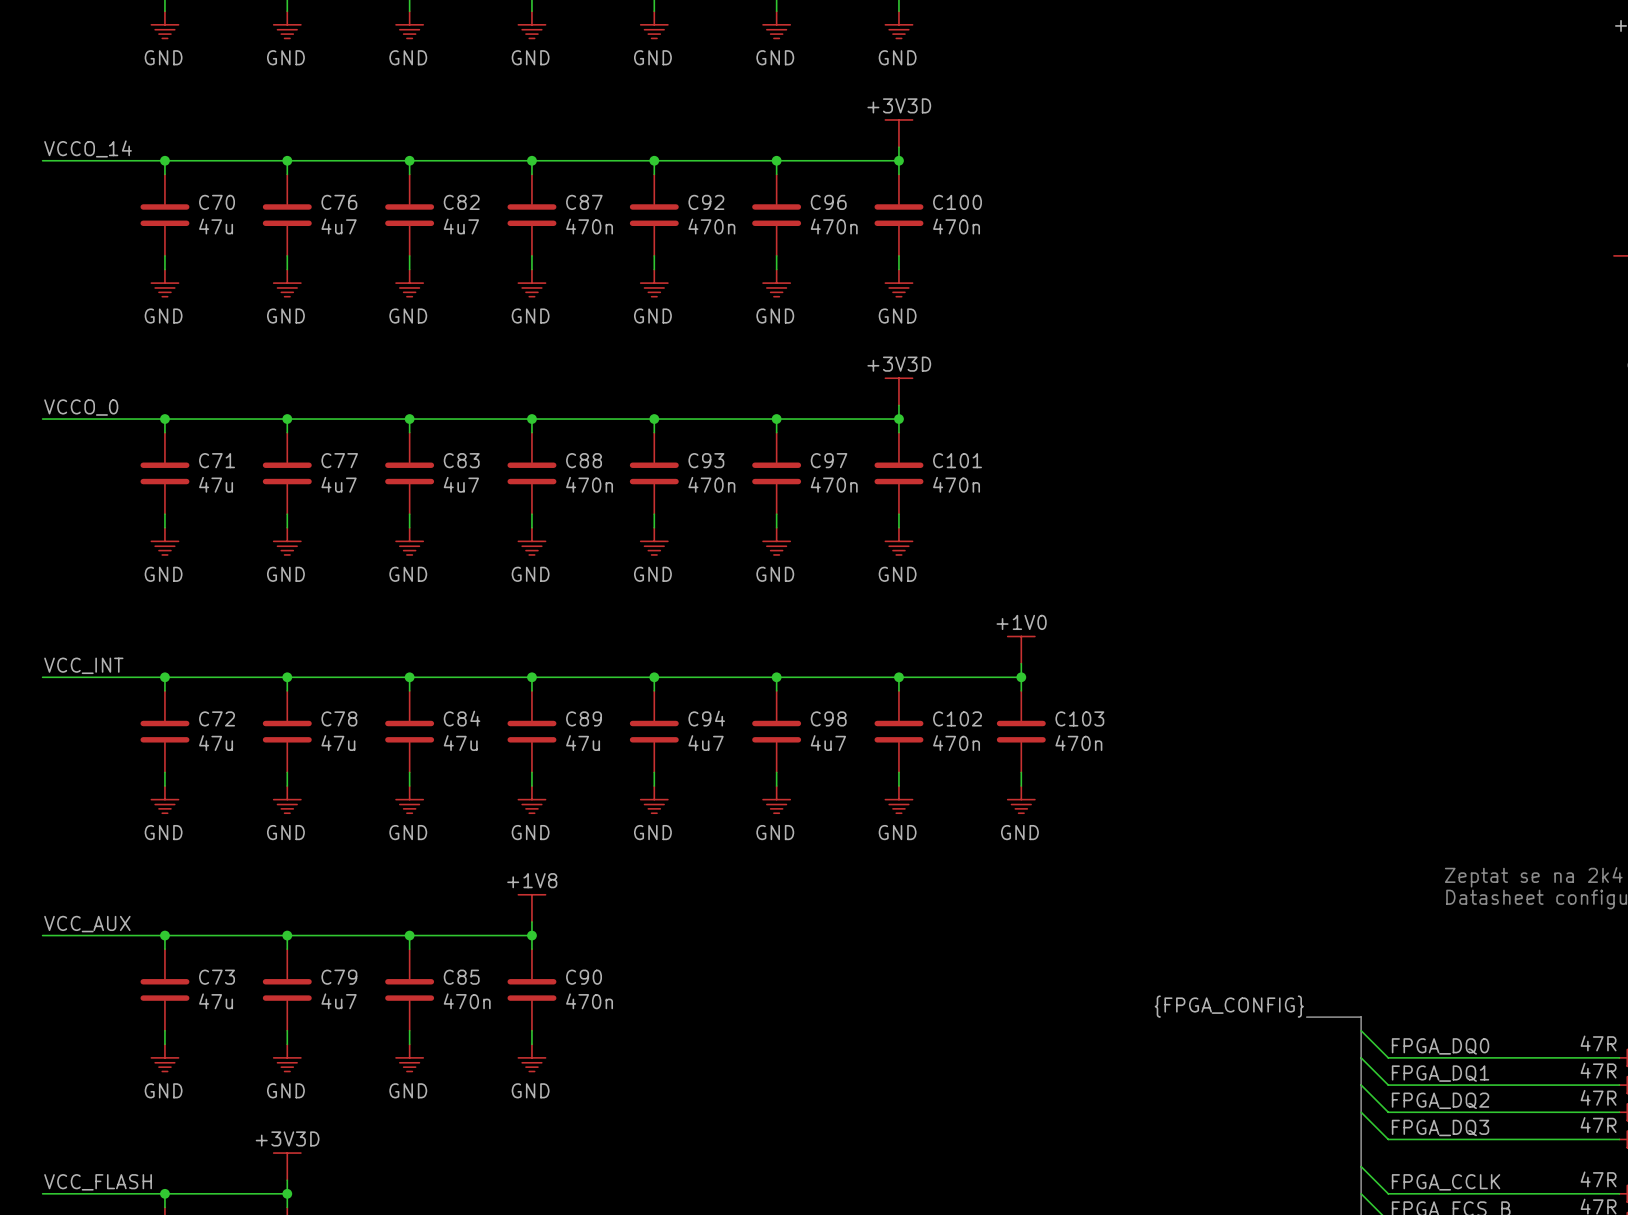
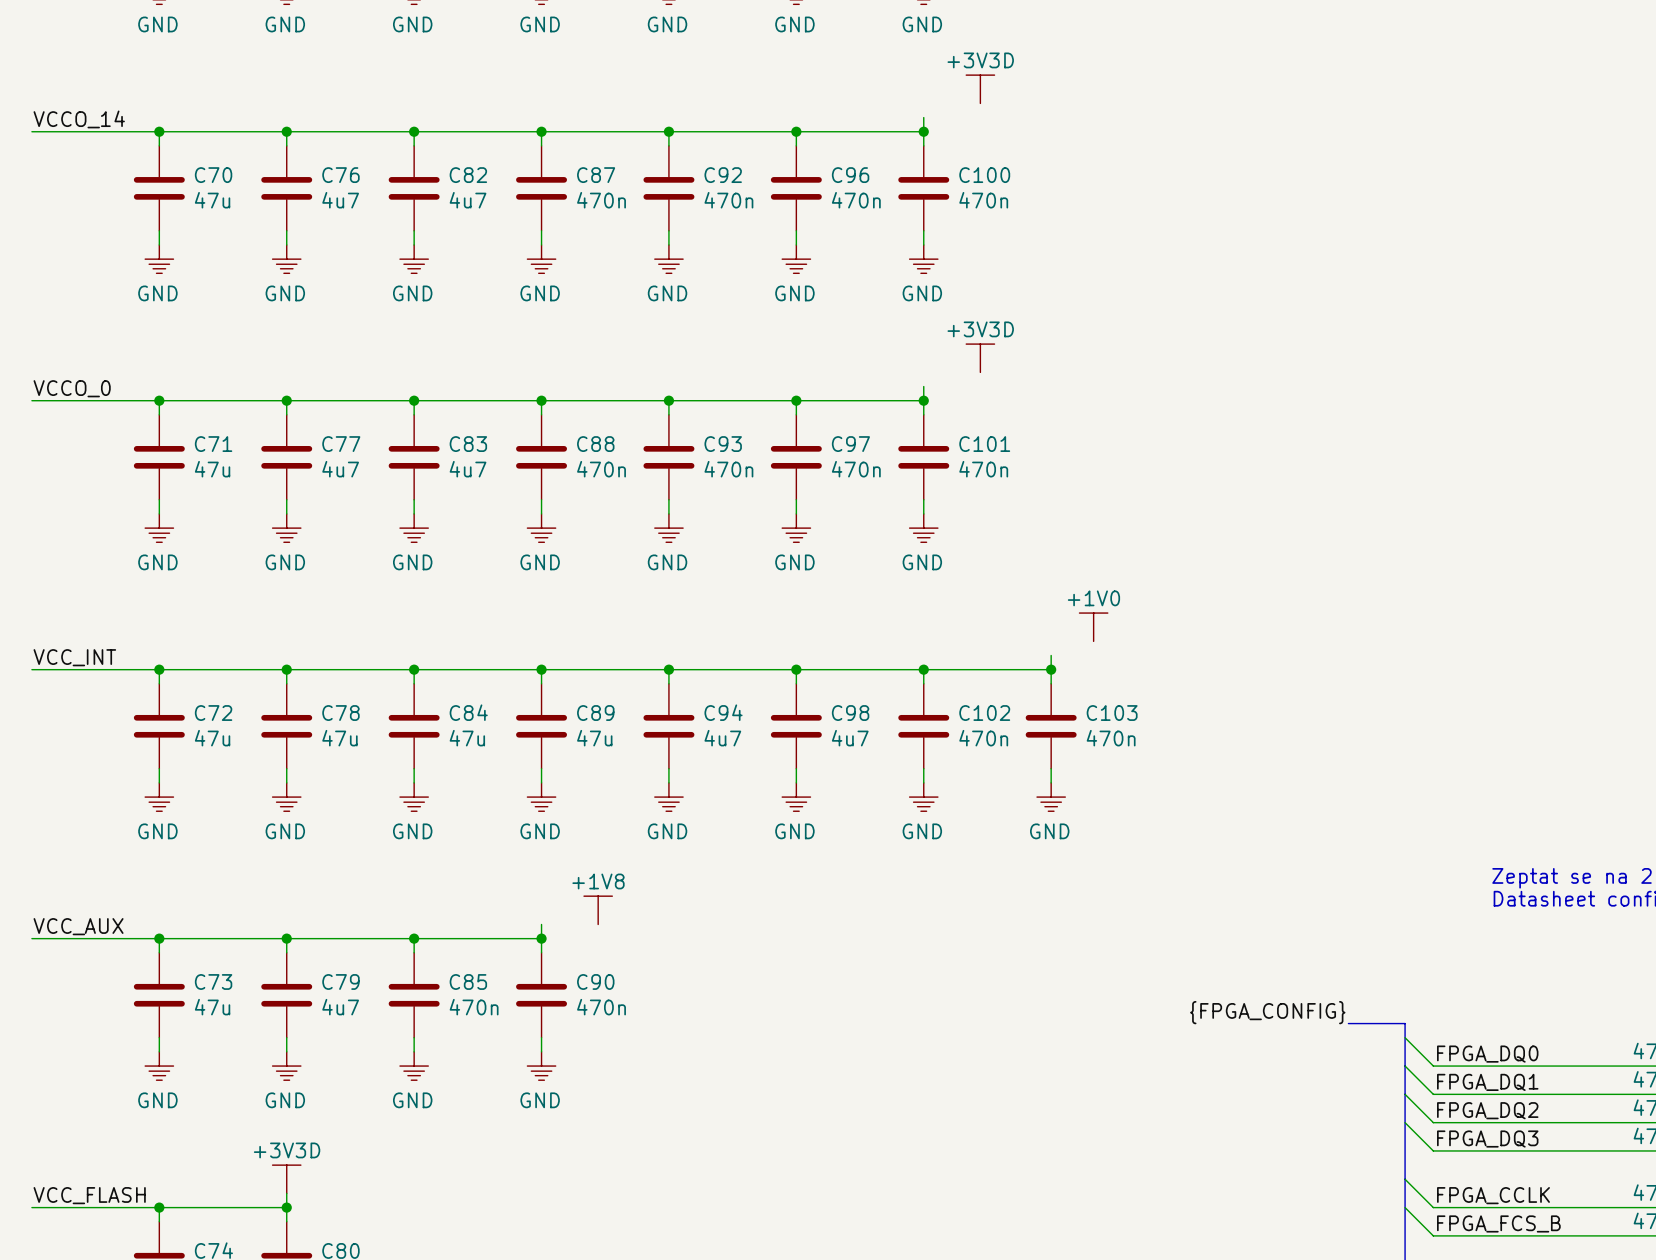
power symbol position: +3V3D (898, 133) -> +3V3D (980, 89)
power symbol position: +3V3D (898, 391) -> +3V3D (980, 358)
power symbol position: +1V0 (1021, 650) -> +1V0 (1093, 627)
power symbol position: +1V8 (531, 908) -> +1V8 (598, 910)

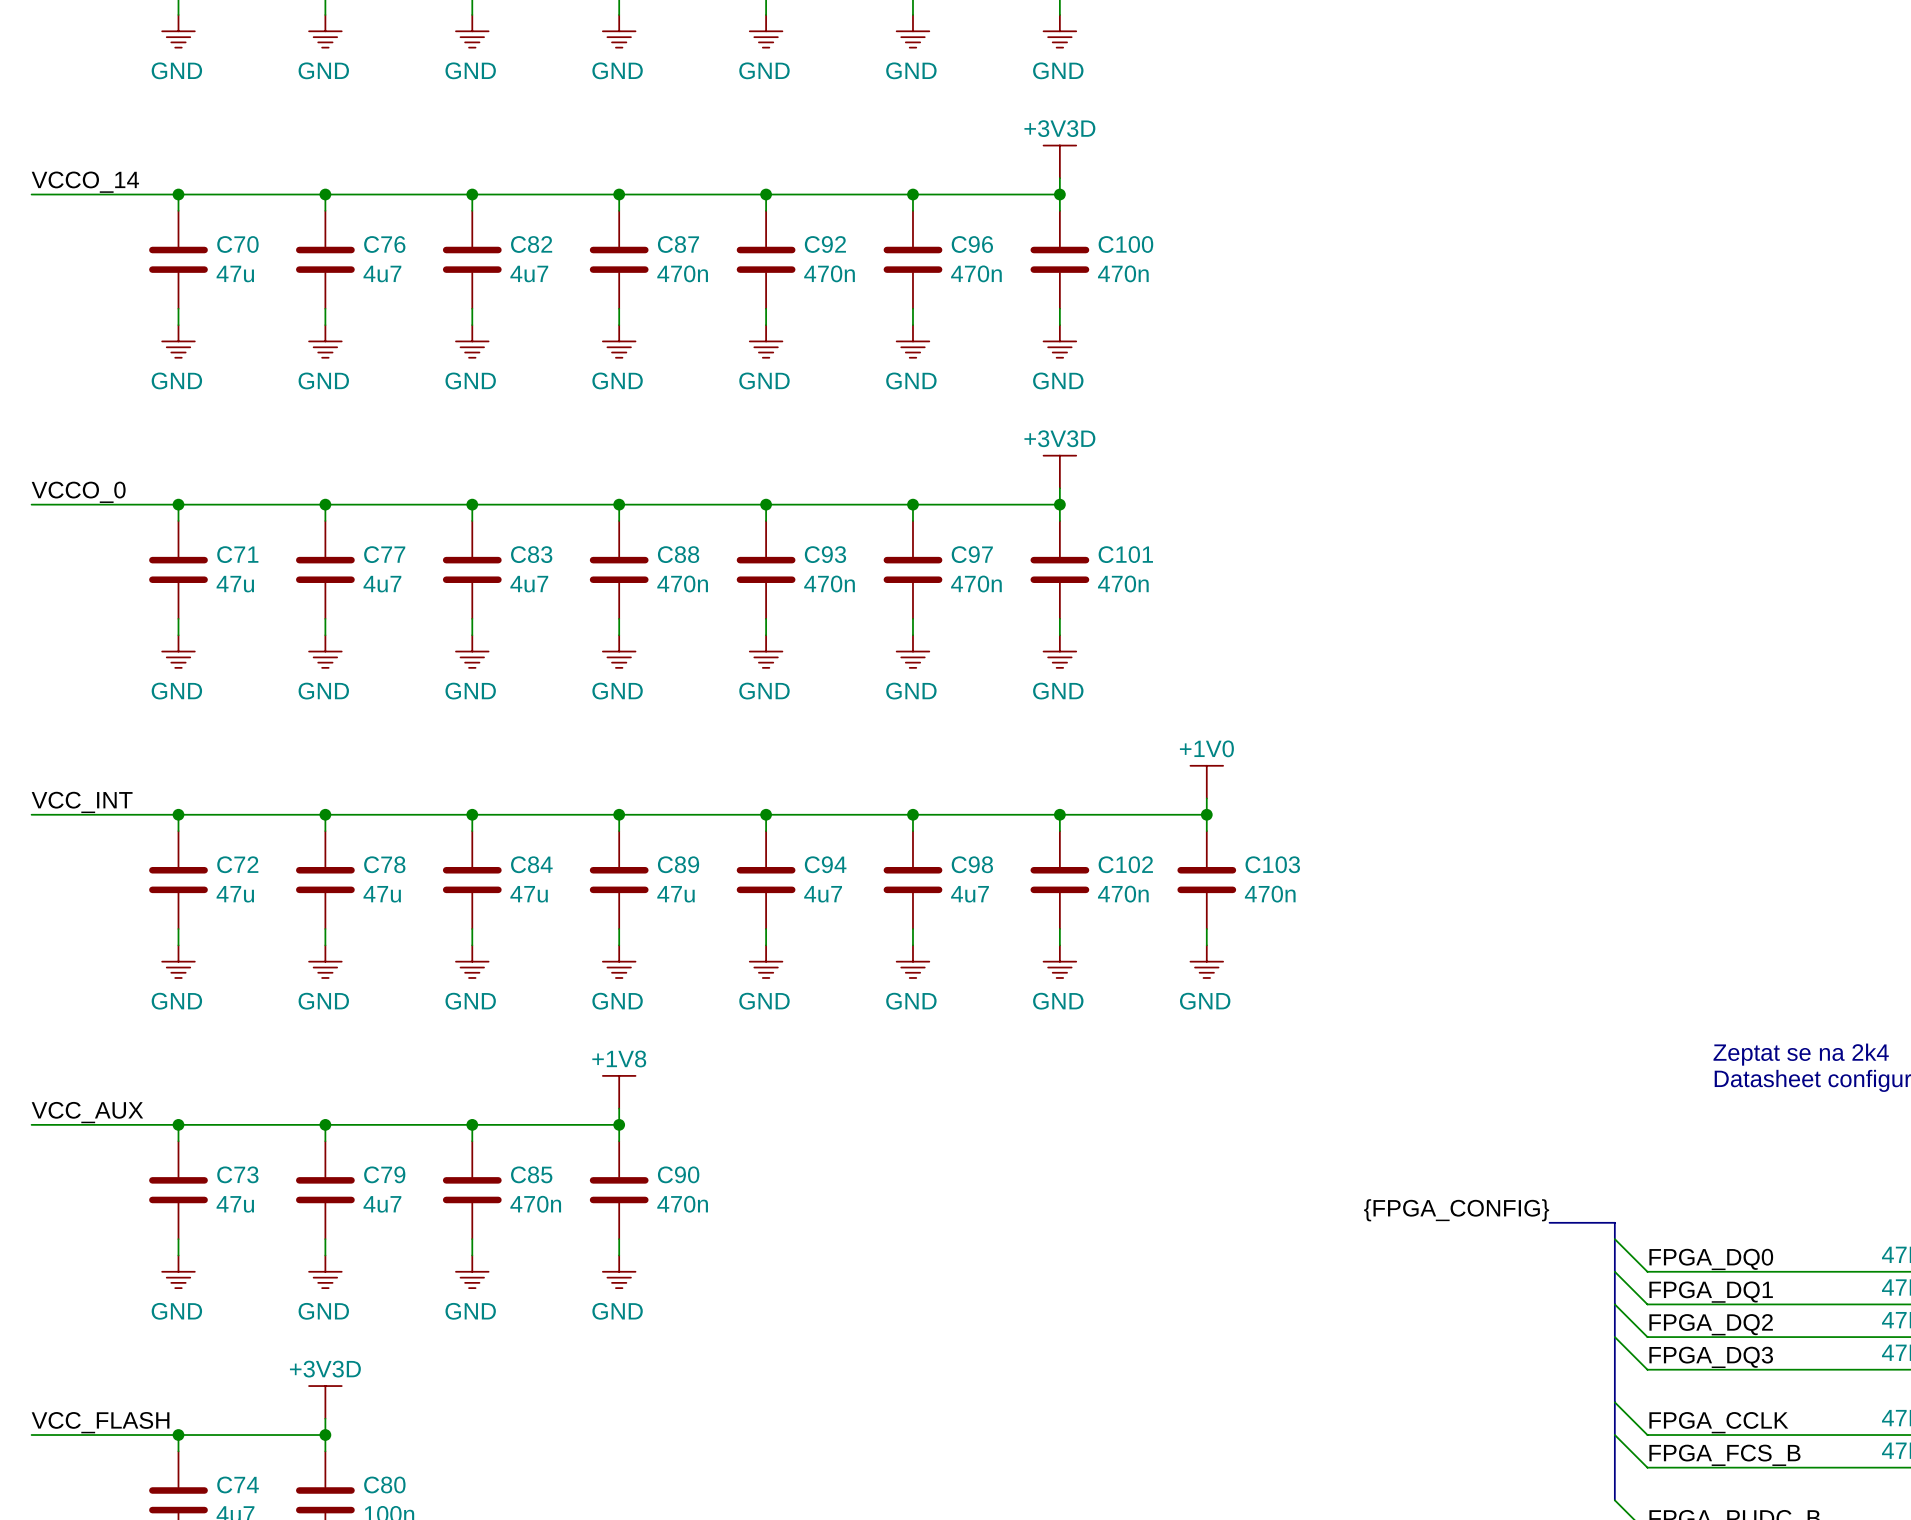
power symbol position: +3V3D (980, 89) -> +3V3D (1059, 161)
power symbol position: +3V3D (980, 358) -> +3V3D (1059, 471)
power symbol position: +1V0 (1093, 627) -> +1V0 (1206, 782)
power symbol position: +1V8 (598, 910) -> +1V8 (619, 1092)

